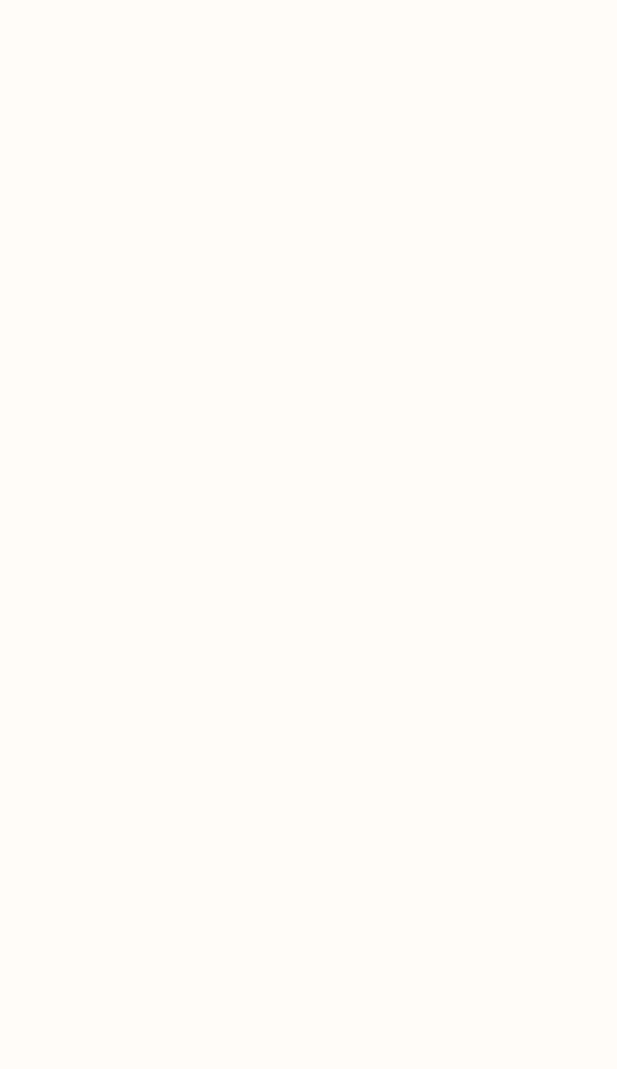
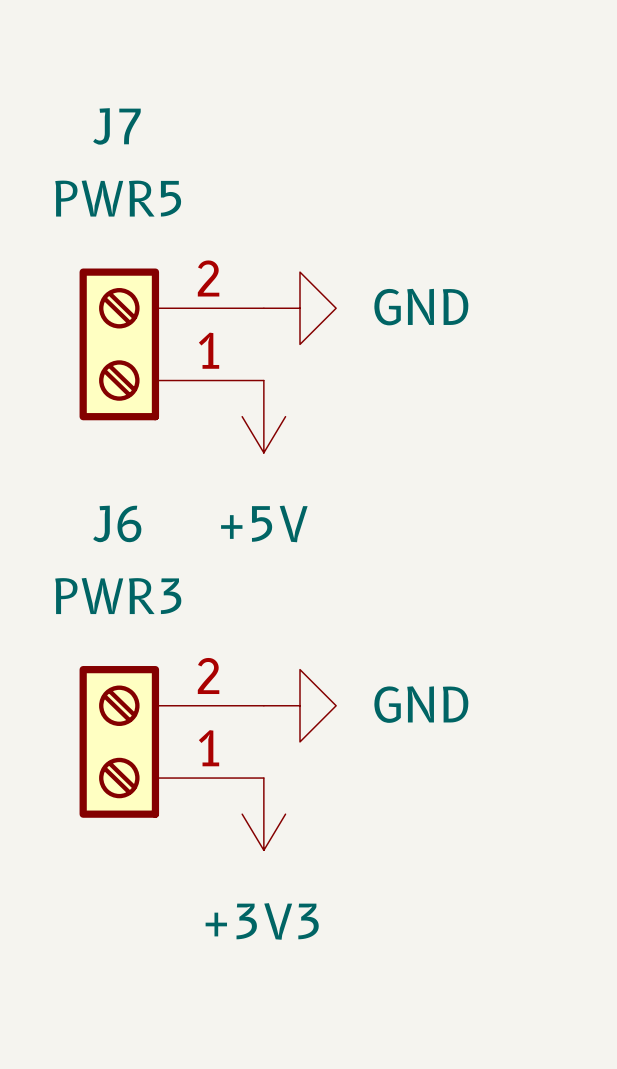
power symbol: none -> GND (300, 308)
J7: none -> PWR5 (171, 344)
power symbol: none -> +5V (263, 416)
power symbol: none -> GND (300, 705)
J6: none -> PWR3 (171, 741)
power symbol: none -> +3V3 (263, 814)

